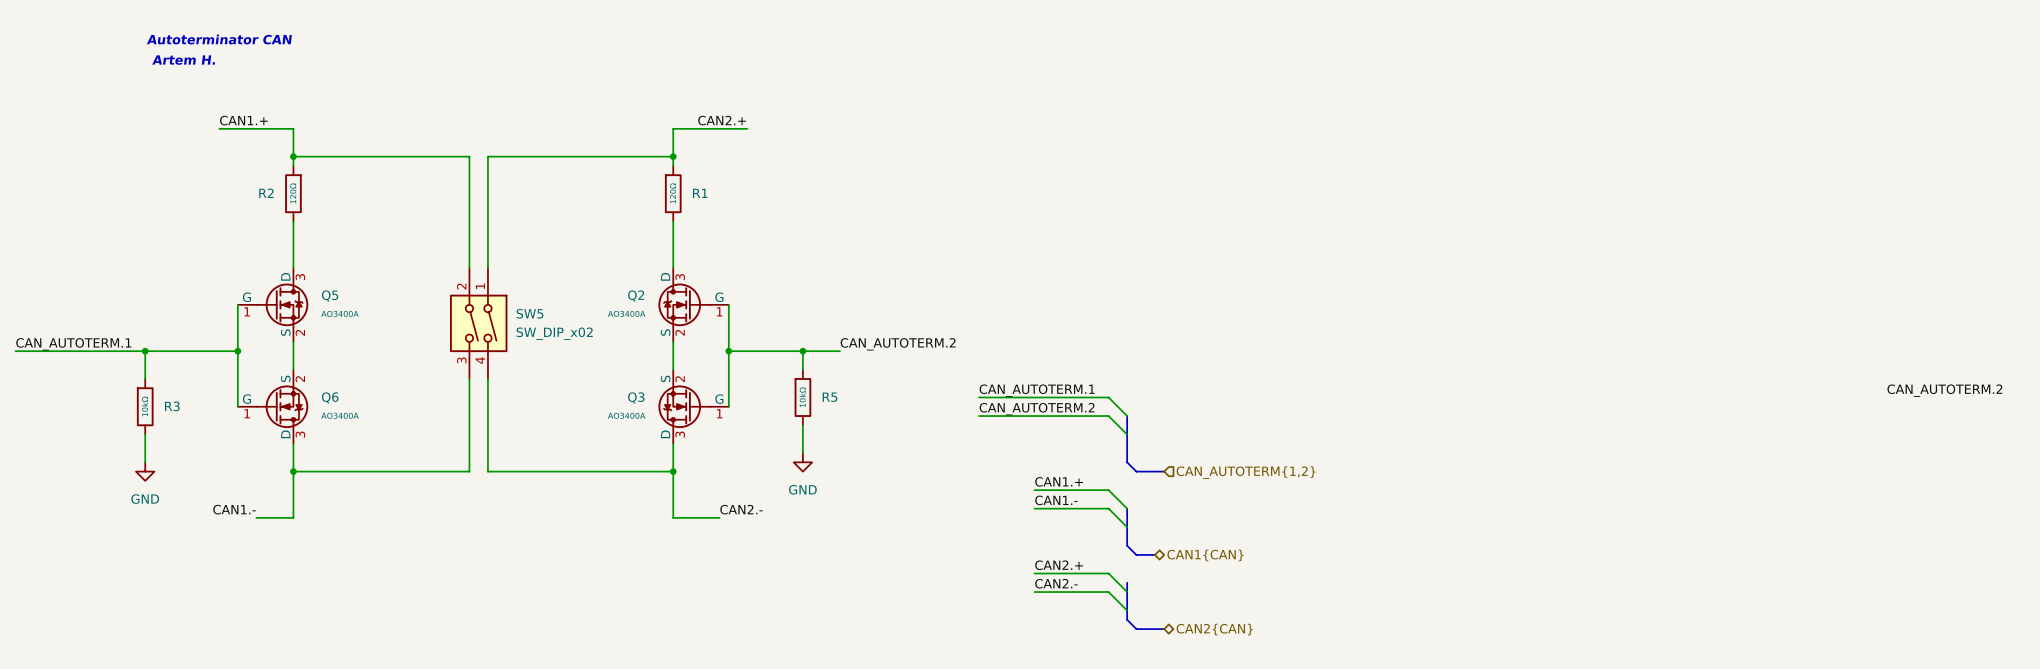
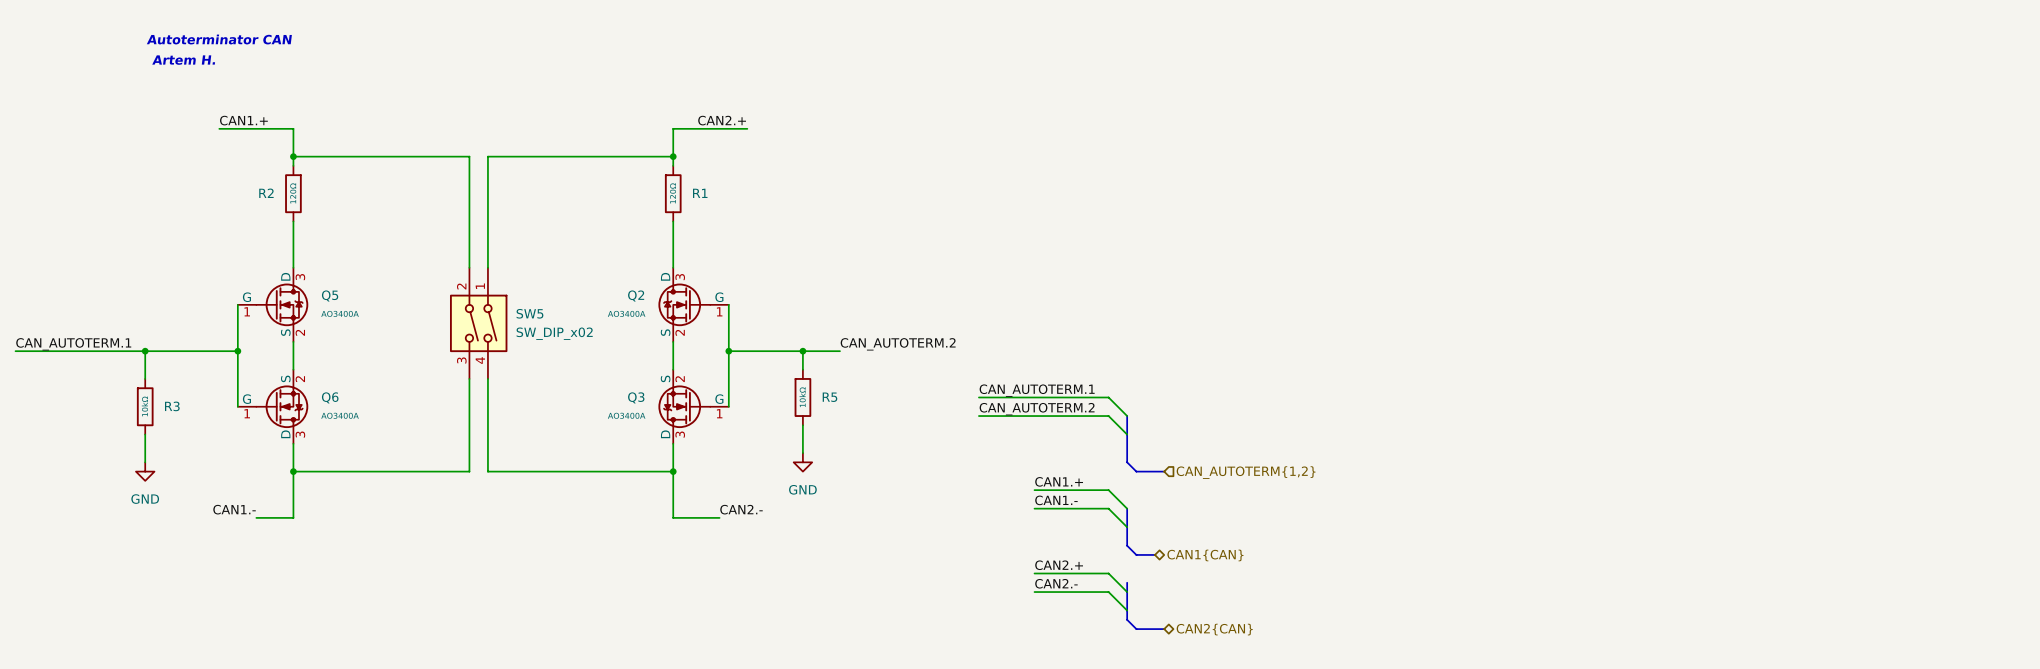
label: CAN_AUTOTERM.2 (1944, 390) -> none

